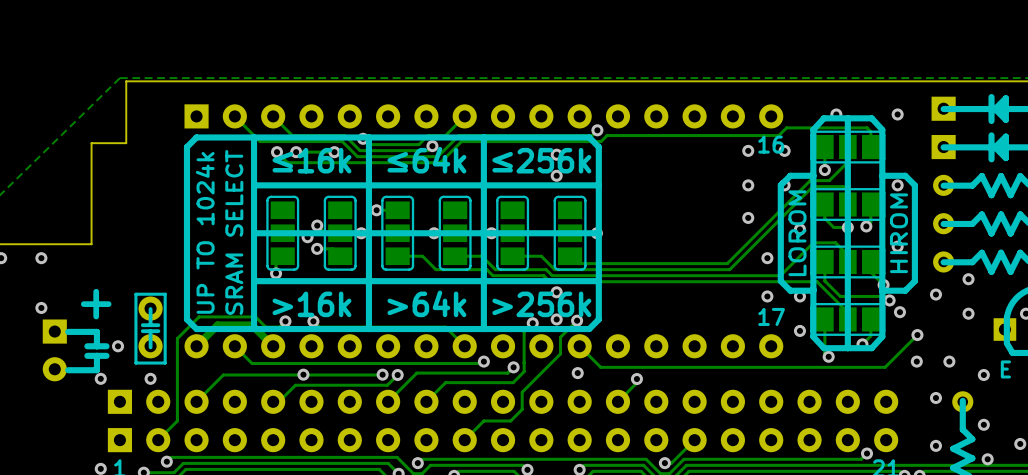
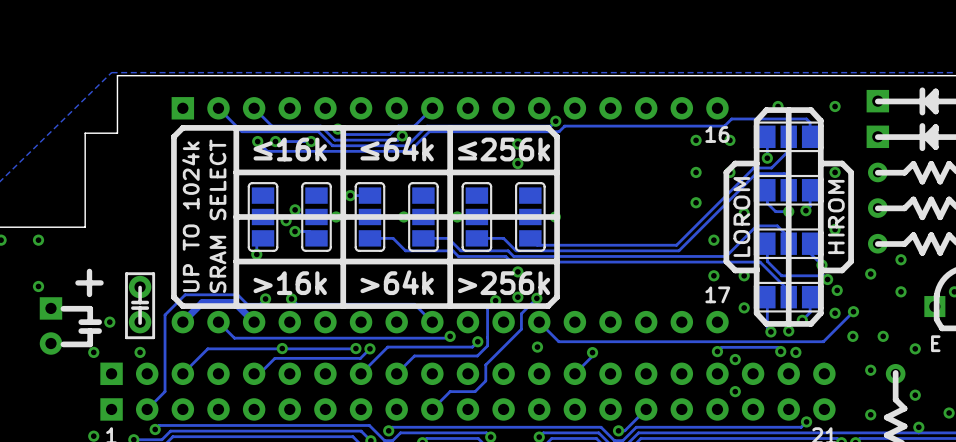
via: none -> (835, 313)
via: none -> (788, 331)
via: none -> (717, 351)
track: none -> (780, 351) (778, 347) (721, 347) (717, 351)
via: none -> (780, 351)
via: none -> (795, 352)
via: none -> (735, 359)
via: none -> (735, 391)

